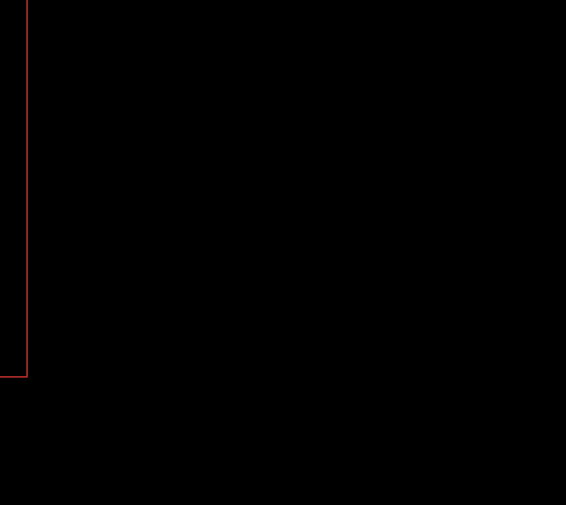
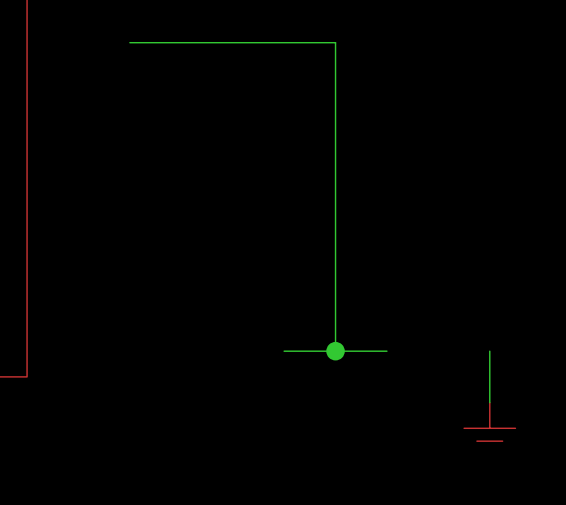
wire: none -> (129, 42) (335, 42) (335, 351)
wire: none -> (284, 351) (386, 351)
junction: none -> (335, 351)
wire: none -> (489, 351) (489, 402)
power symbol: none -> (489, 428)

